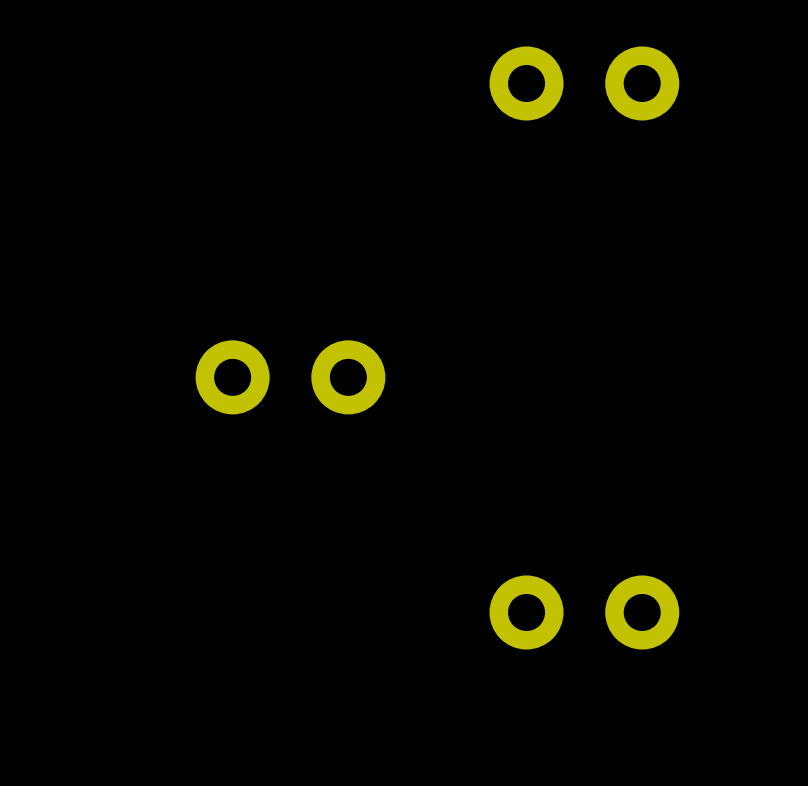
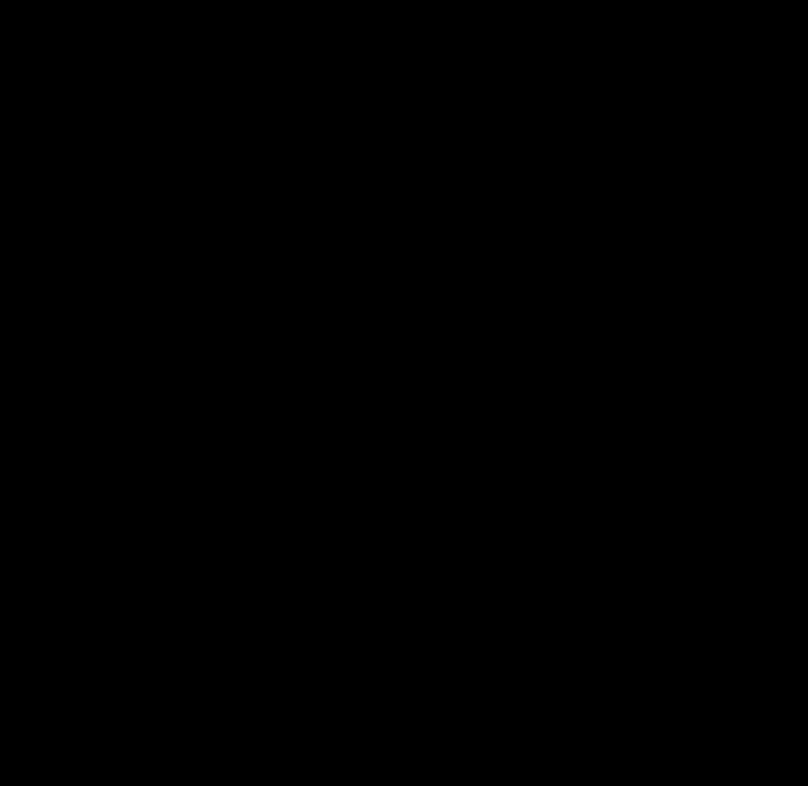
part: (584, 83) -> none
part: (290, 377) -> none
part: (584, 612) -> none

